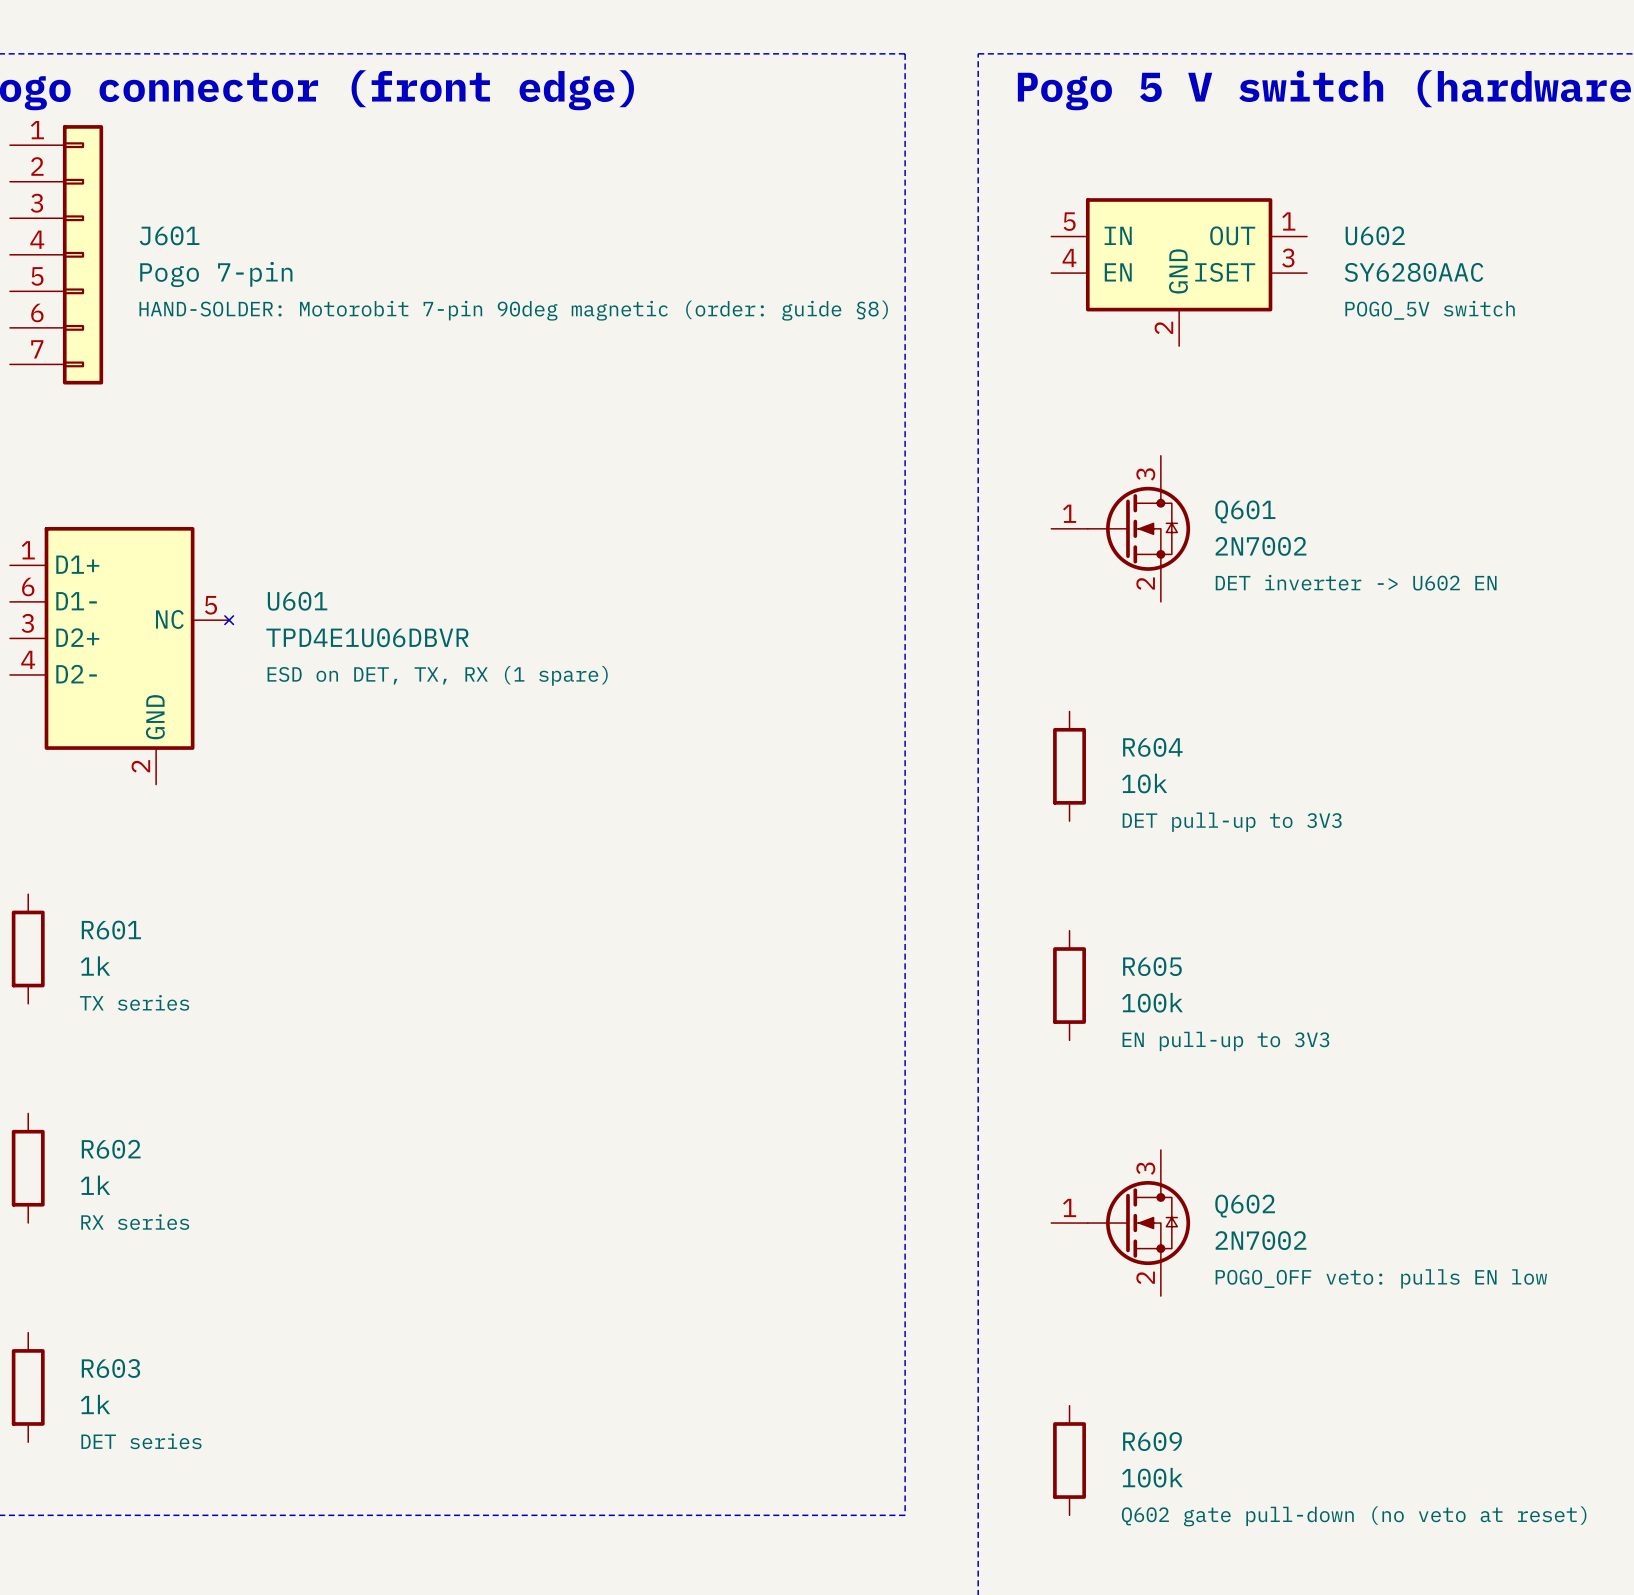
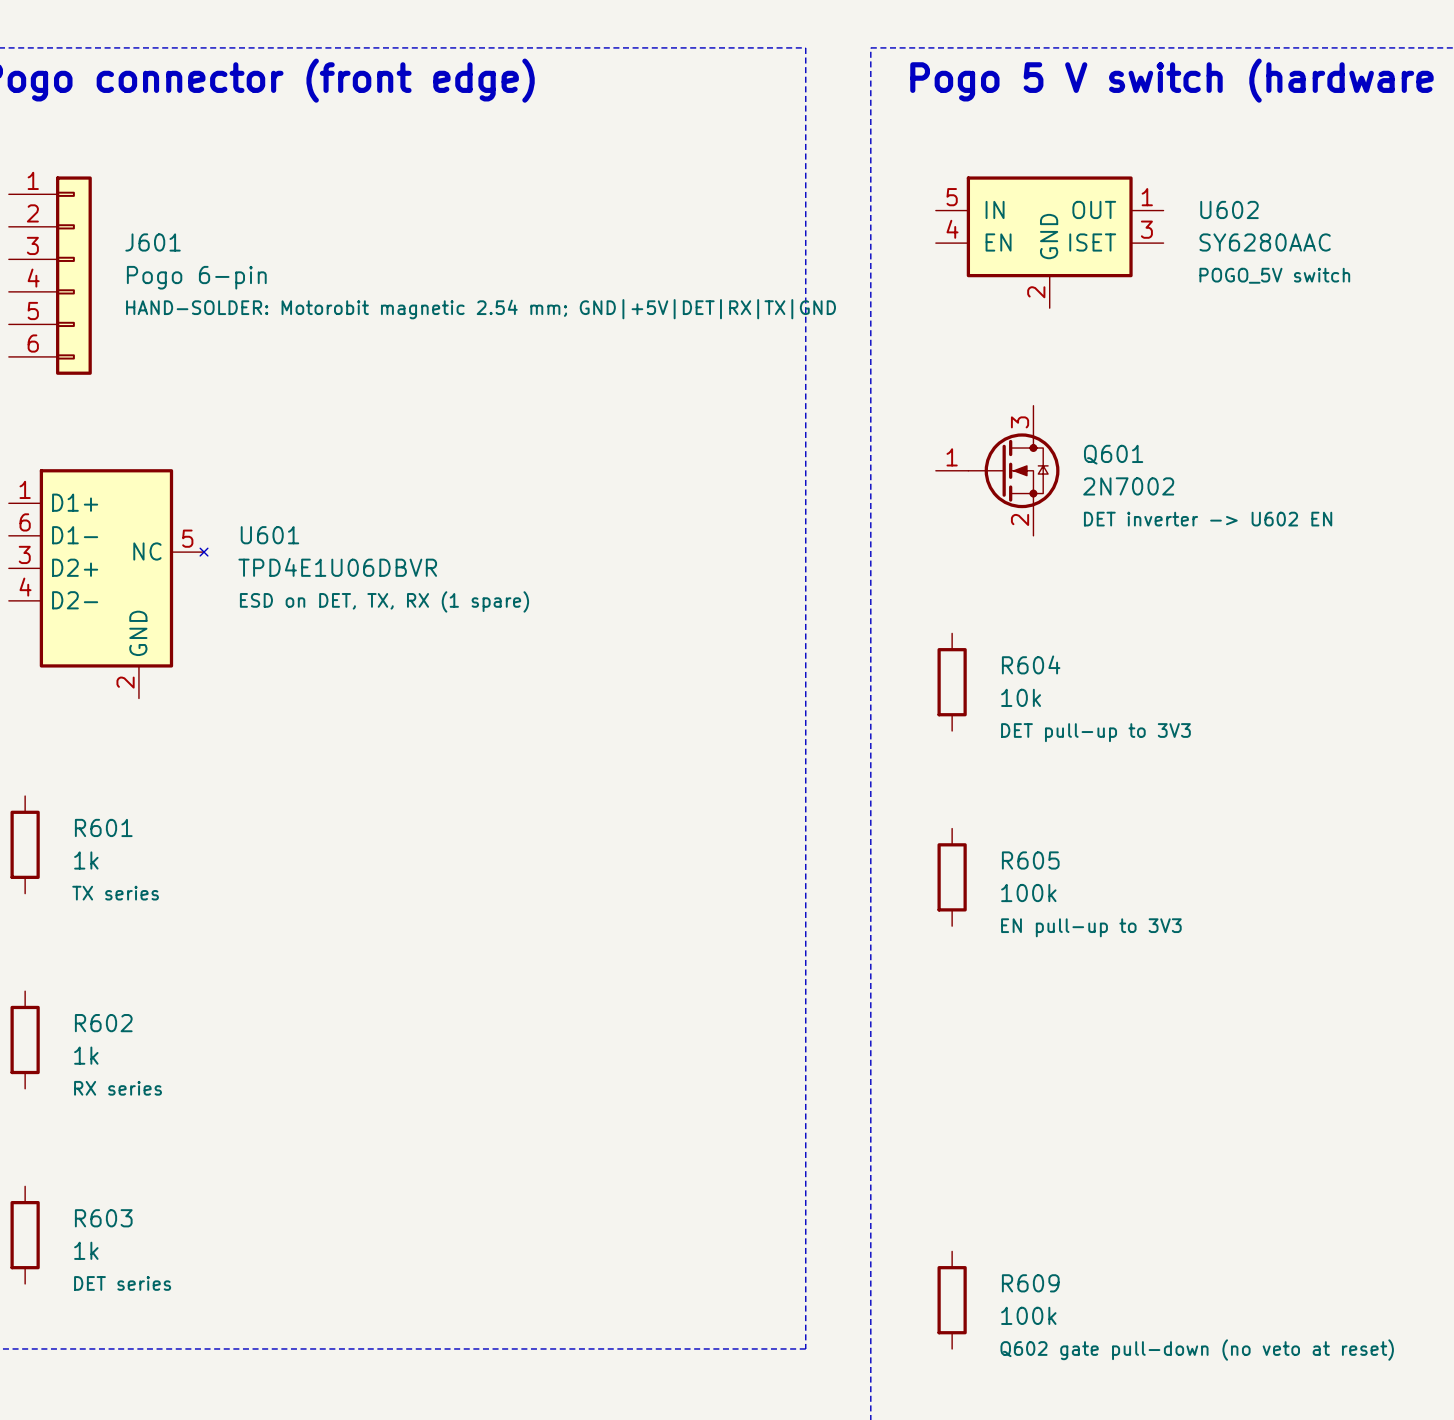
J601 symbol: [9, 125, 104, 385] -> [8, 176, 92, 375]
J601 value: Pogo 7-pin (216, 274) -> Pogo 6-pin (196, 277)
J601 text: HAND-SOLDER: Motorobit 7-pin 90deg magnetic (order: guide §8) (513, 310) -> HAND-SOLDER: Motorobit magnetic 2.54 mm; GND|+5V|DET|RX|TX|GND (481, 309)
Q602: 2N7002 (1120, 1223) -> none

